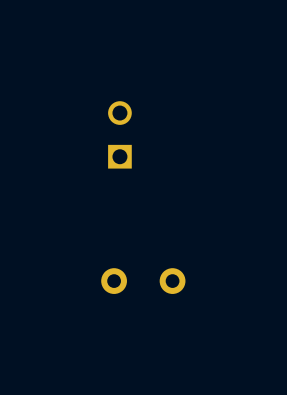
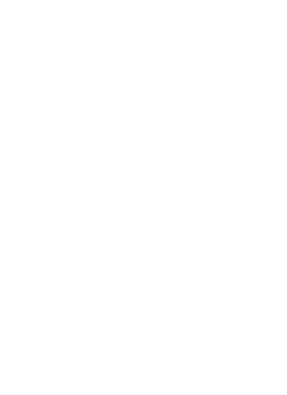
part: (119, 134) -> none
part: (143, 281) -> none

